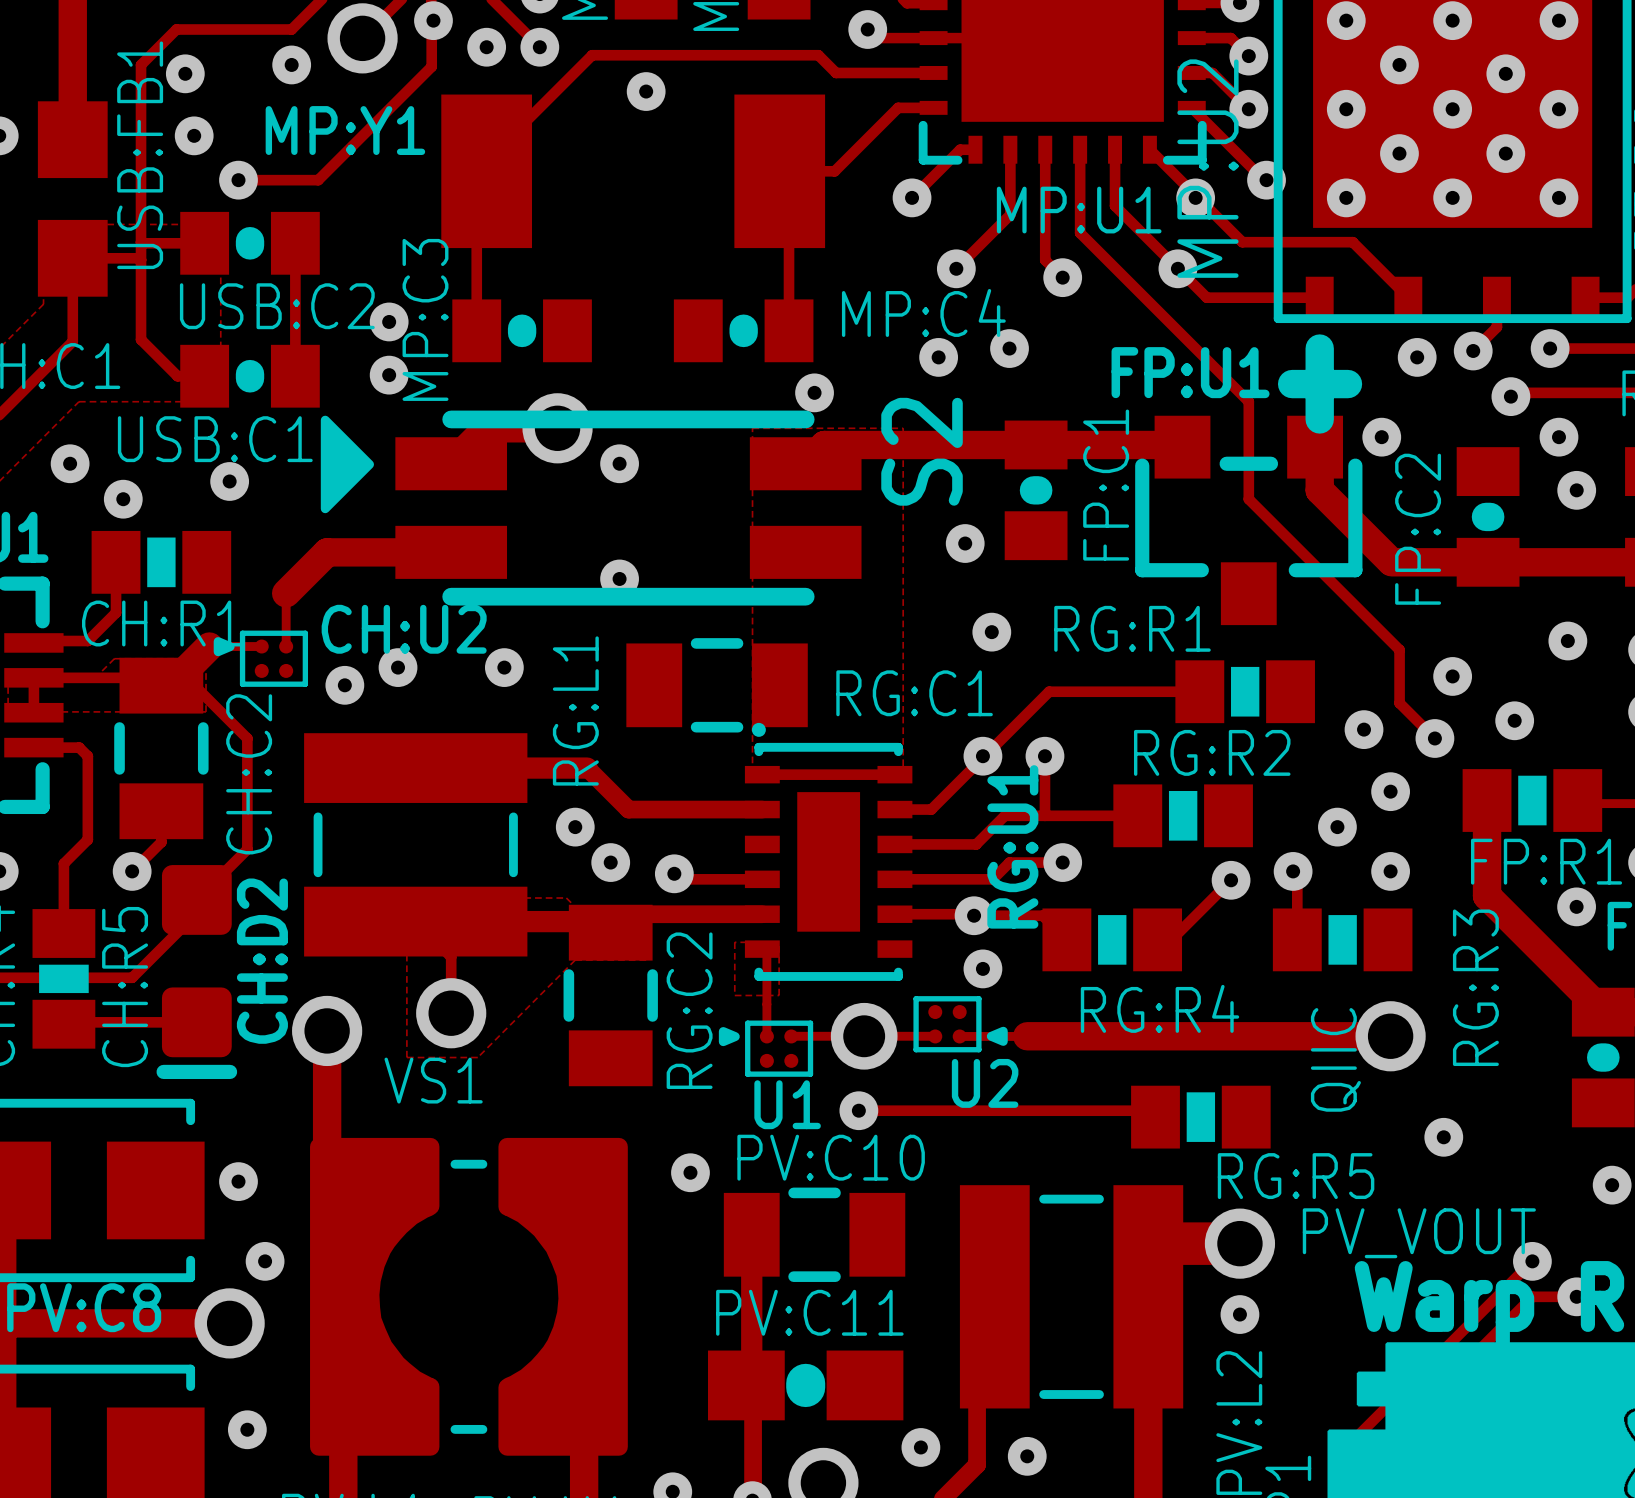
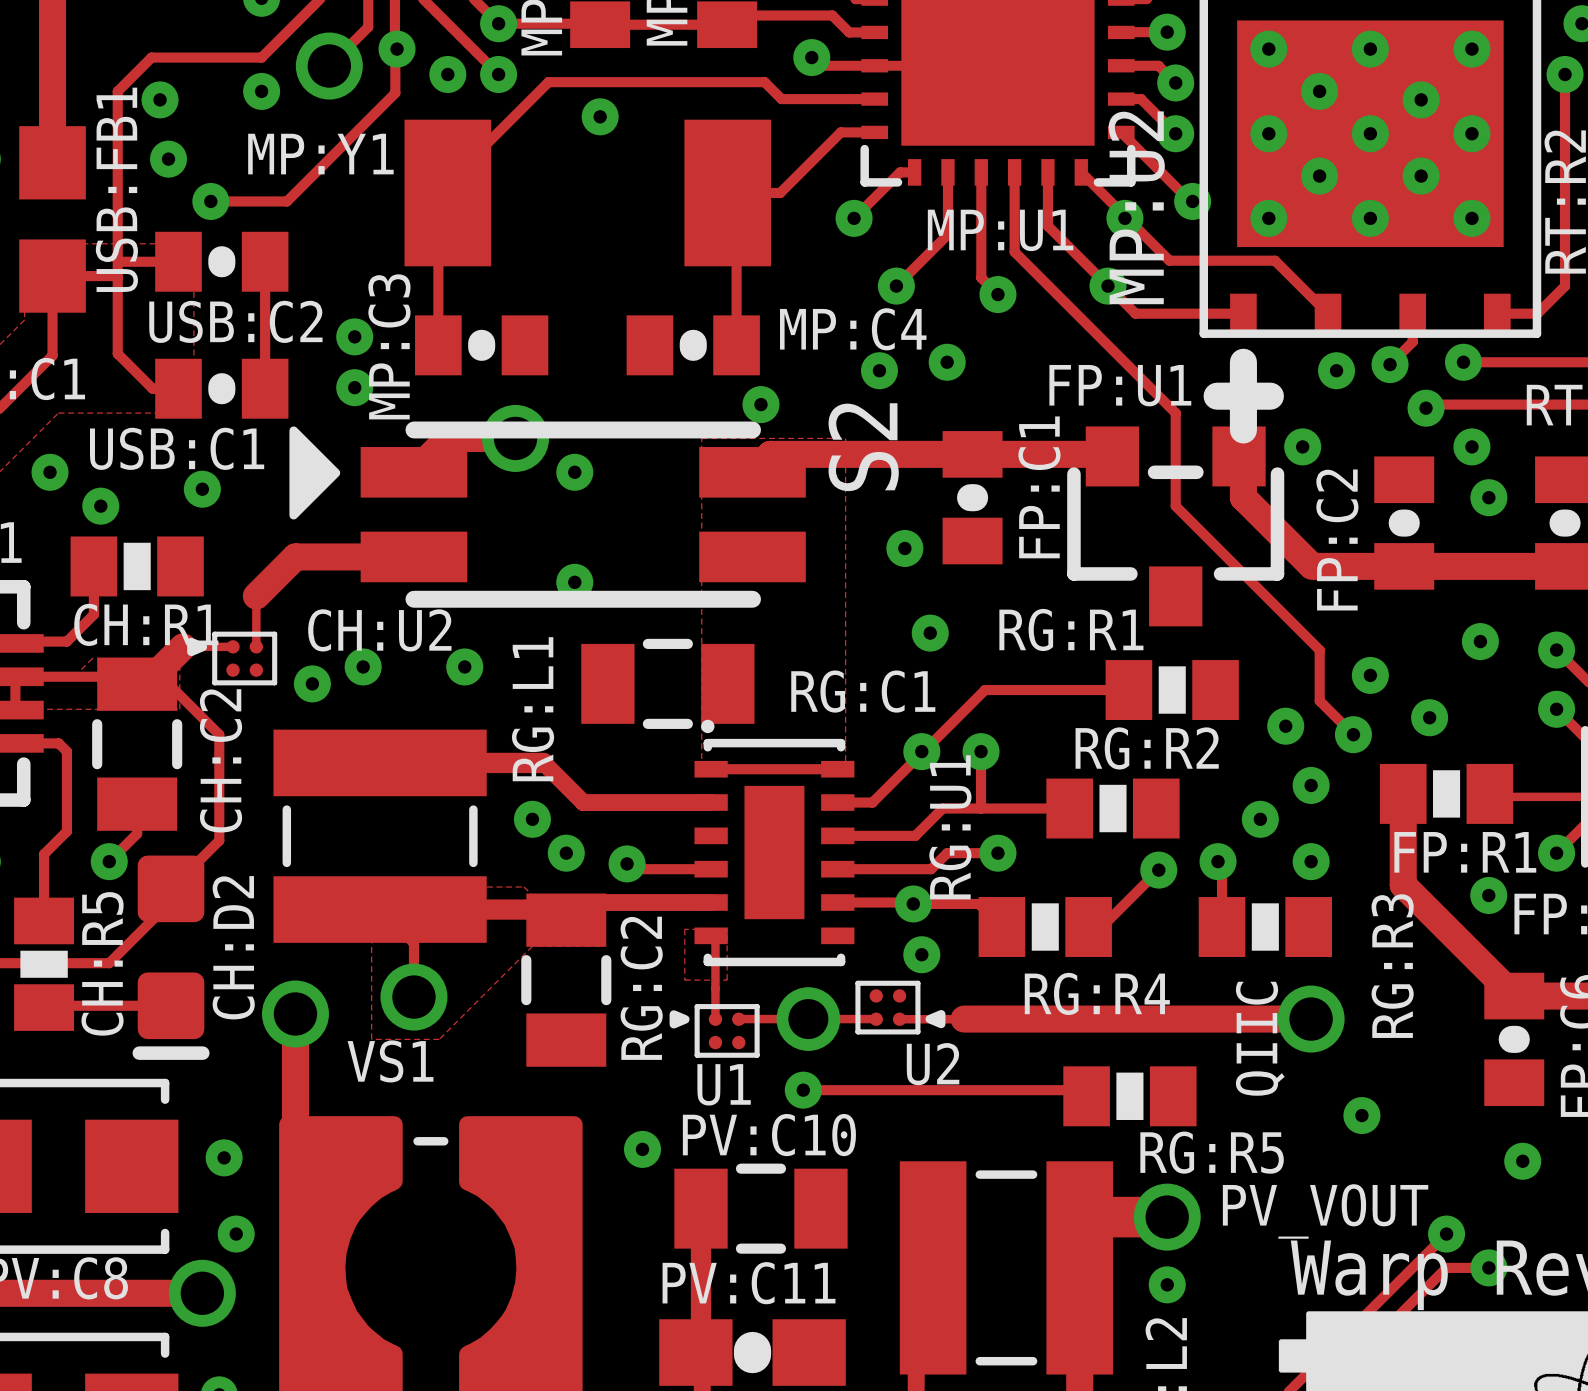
via position: (238, 1181) -> (224, 1157)

